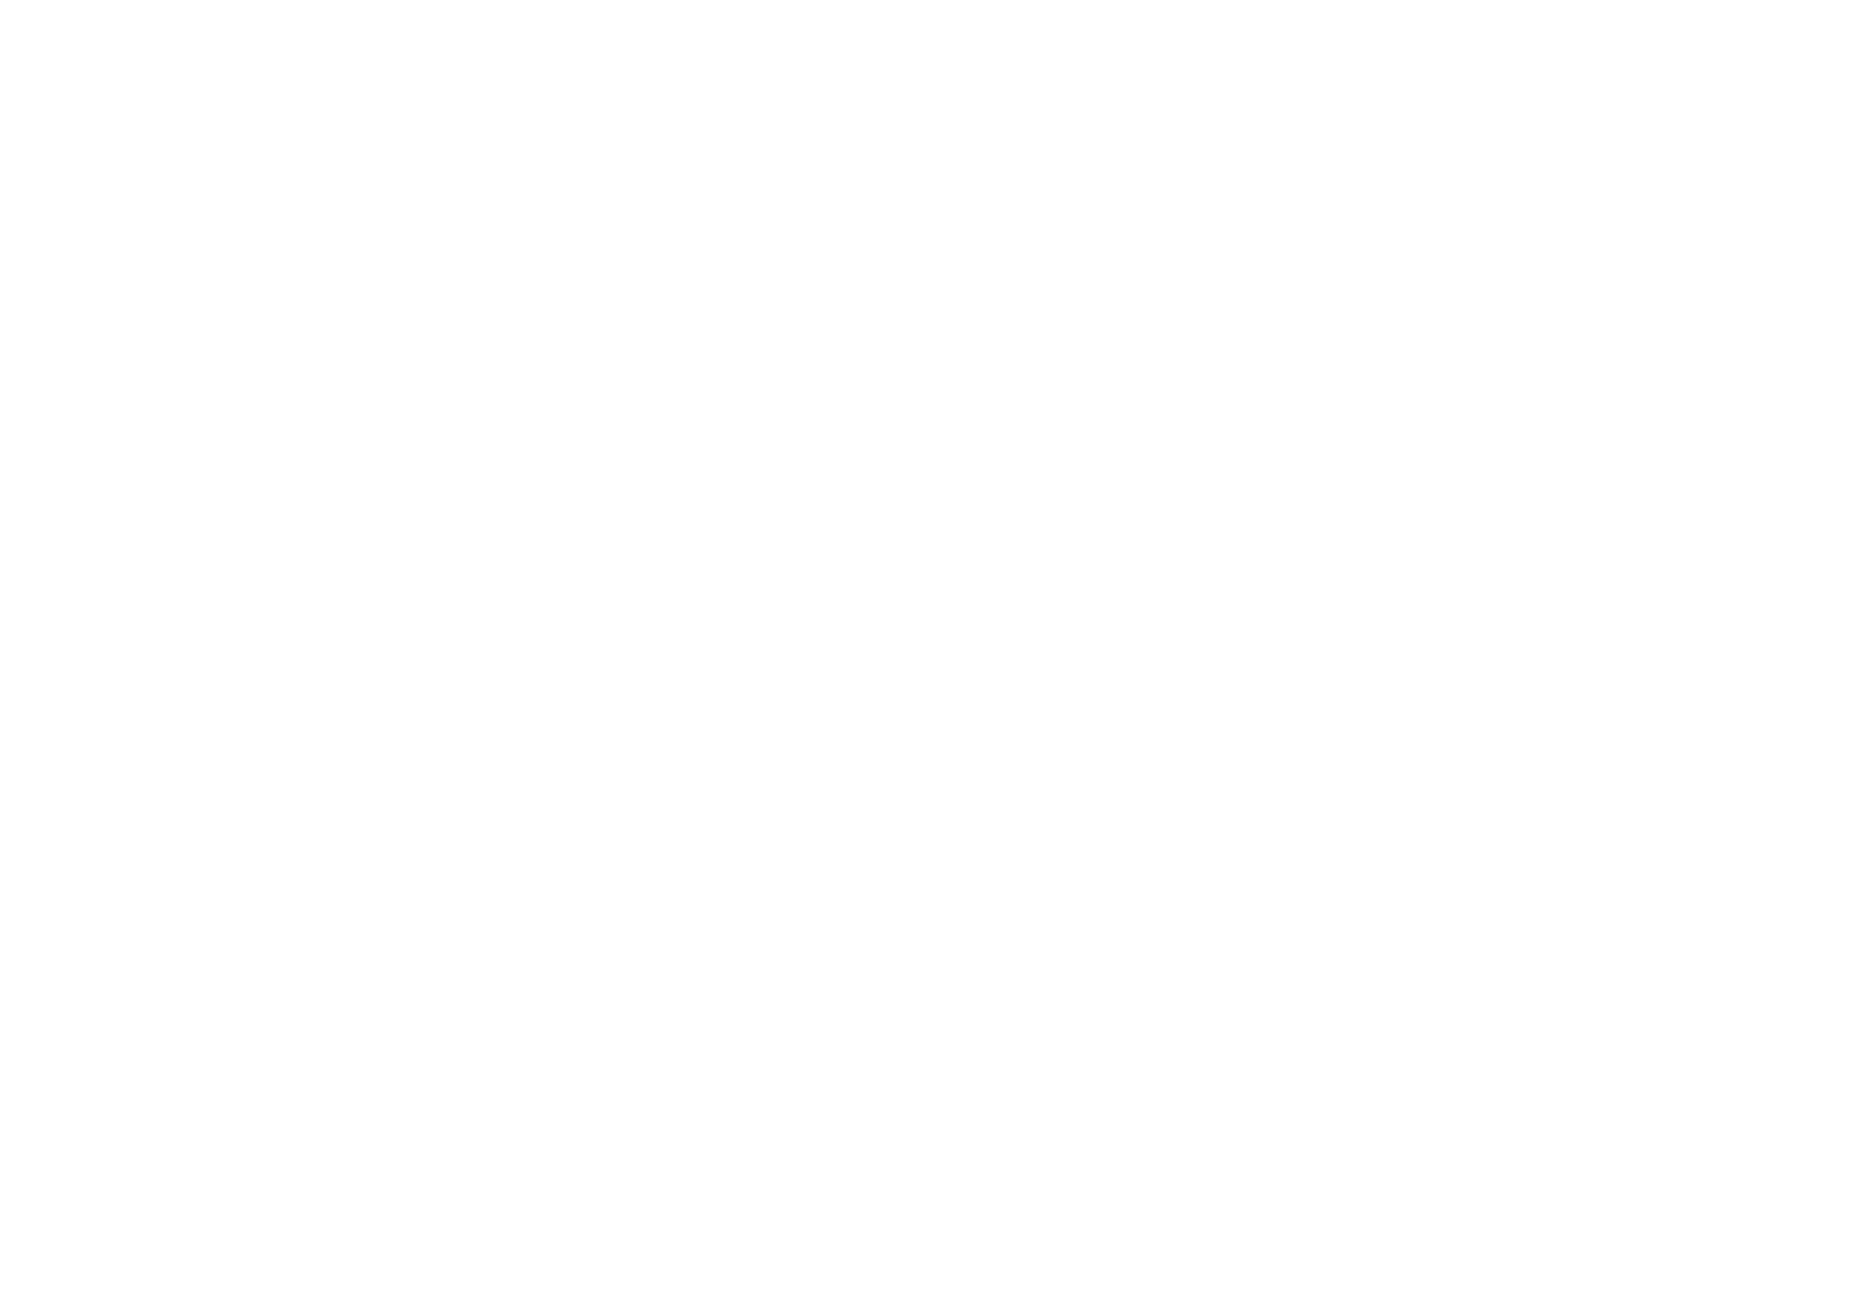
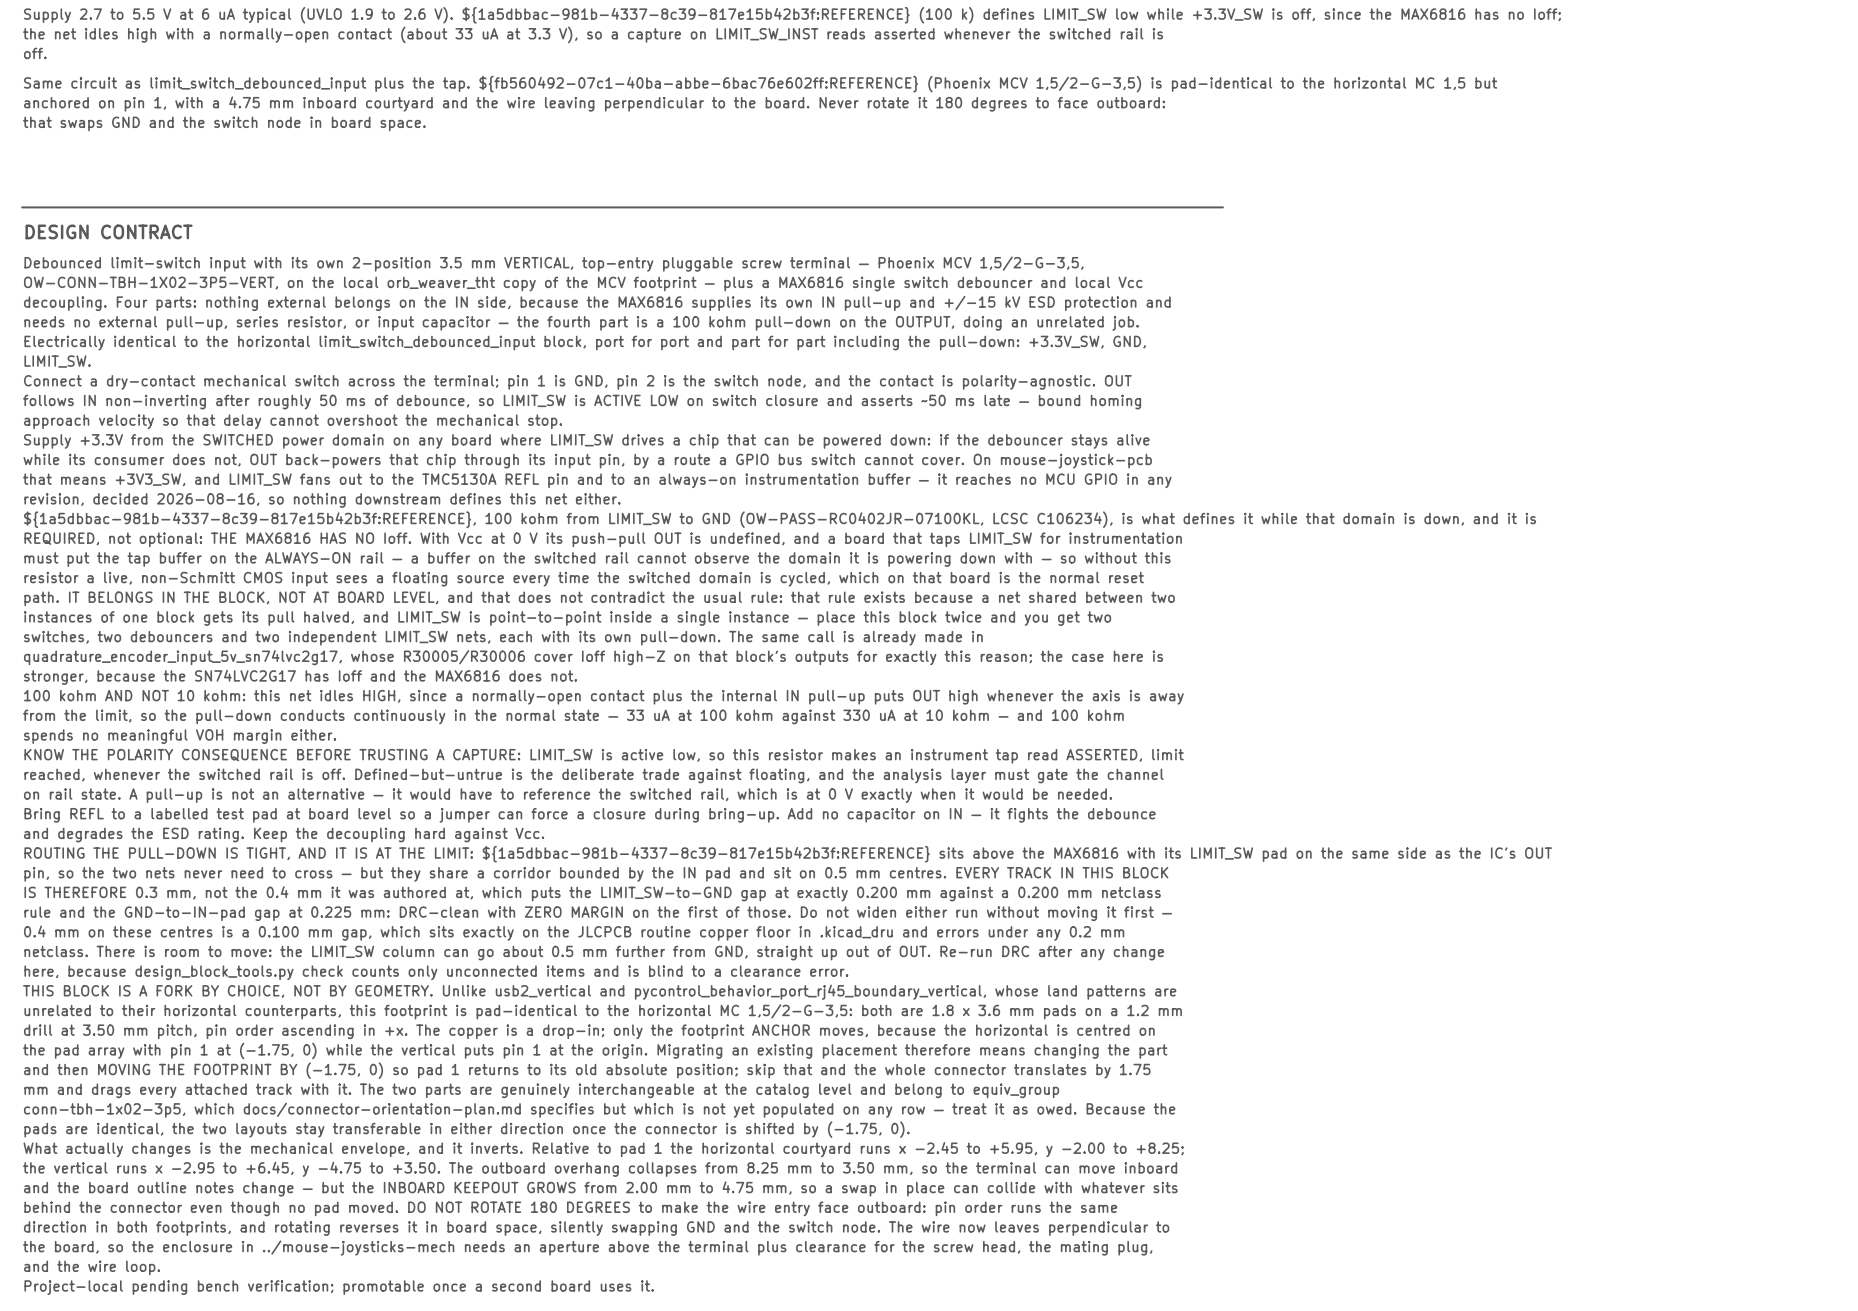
text: none -> Supply 2.7 to 5.5 V at 6 uA typical (UVLO 1.9 to 2.6 V). ${1a5dbbac-981b-4337-8c39-817e15b42b3f:REFERENCE} (100 k) defines LIMIT_SW low while +3.3V_SW is off, since the MAX6816 has no Ioff; (792, 15)
text: none -> the net idles high with a normally-open contact (about 33 uA at 3.3 V), so a capture on LIMIT_SW_INST reads asserted whenever the switched rail is (593, 34)
text: none -> off. (35, 53)
text: none -> Same circuit as limit_switch_debounced_input plus the tap. ${fb560492-07c1-40ba-abbe-6bac76e602ff:REFERENCE} (Phoenix MCV 1,5/2-G-3,5) is pad-identical to the horizontal MC 1,5 but (760, 84)
text: none -> anchored on pin 1, with a 4.75 mm inboard courtyard and the wire leaving perpendicular to the board. Never rotate it 180 degrees to face outboard: (594, 104)
text: none -> that swaps GND and the switch node in board space. (224, 123)
line: none -> (22, 207) (1222, 207)
text: none -> DESIGN CONTRACT (109, 231)
text: none -> Debounced limit-switch input with its own 2-position 3.5 mm VERTICAL, top-entry pluggable screw terminal — Phoenix MCV 1,5/2-G-3,5, (553, 264)
text: none -> OW-CONN-TBH-1X02-3P5-VERT, on the local orb_weaver_tht copy of the MCV footprint — plus a MAX6816 single switch debouncer and local Vcc (583, 284)
text: none -> decoupling. Four parts: nothing external belongs on the IN side, because the MAX6816 supplies its own IN pull-up and +/-15 kV ESD protection and (597, 303)
text: none -> needs no external pull-up, series resistor, or input capacitor — the fourth part is a 100 kohm pull-down on the OUTPUT, doing an unrelated job. (581, 323)
text: none -> Electrically identical to the horizontal limit_switch_debounced_input block, port for port and part for part including the pull-down: +3.3V_SW, GND, (585, 343)
text: none -> LIMIT_SW. (57, 361)
text: none -> Connect a dry-contact mechanical switch across the terminal; pin 1 is GND, pin 2 is the switch node, and the contact is polarity-agnostic. OUT (577, 382)
text: none -> follows IN non-inverting after roughly 50 ms of debounce, so LIMIT_SW is ACTIVE LOW on switch closure and asserts ~50 ms late — bound homing (582, 402)
text: none -> approach velocity so that delay cannot overshoot the mechanical stop. (293, 421)
text: none -> Supply +3.3V from the SWITCHED power domain on any board where LIMIT_SW drives a chip that can be powered down: if the debouncer stays alive (586, 441)
text: none -> while its consumer does not, OUT back-powers that chip through its input pin, by a route a GPIO bus switch cannot cover. On mouse-joystick-pcb (587, 461)
text: none -> that means +3V3_SW, and LIMIT_SW fans out to the TMC5130A REFL pin and to an always-on instrumentation buffer — it reaches no MCU GPIO in any (597, 480)
text: none -> revision, decided 2026-08-16, so nothing downstream defines this net either. (322, 500)
text: none -> ${1a5dbbac-981b-4337-8c39-817e15b42b3f:REFERENCE}, 100 kohm from LIMIT_SW to GND (OW-PASS-RC0402JR-07100KL, LCSC C106234), is what defines it while that domain is down, and it is (780, 519)
text: none -> REQUIRED, not optional: THE MAX6816 HAS NO Ioff. With Vcc at 0 V its push-pull OUT is undefined, and a board that taps LIMIT_SW for instrumentation (603, 539)
text: none -> must put the tap buffer on the ALWAYS-ON rail — a buffer on the switched rail cannot observe the domain it is powering down with — so without this (597, 559)
text: none -> resistor a live, non-Schmitt CMOS input sees a floating source every time the switched domain is cycled, which on that board is the normal reset (584, 579)
text: none -> path. IT BELONGS IN THE BLOCK, NOT AT BOARD LEVEL, and that does not contradict the usual rule: that rule exists because a net shared between two (599, 598)
text: none -> instances of one block gets its pull halved, and LIMIT_SW is point-to-point inside a single instance — place this block twice and you get two (567, 618)
text: none -> switches, two debouncers and two independent LIMIT_SW nets, each with its own pull-down. The same call is already made in (503, 638)
text: none -> quadrature_encoder_input_5v_sn74lvc2g17, whose R30005/R30006 cover Ioff high-Z on that block's outputs for exactly this reason; the case here is (593, 657)
text: none -> stronger, because the SN74LVC2G17 has Ioff and the MAX6816 does not. (300, 677)
text: none -> 100 kohm AND NOT 10 kohm: this net idles HIGH, since a normally-open contact plus the internal IN pull-up puts OUT high whenever the axis is away (603, 697)
text: none -> from the limit, so the pull-down conducts continuously in the normal state — 33 uA at 100 kohm against 330 uA at 10 kohm — and 100 kohm (573, 716)
text: none -> spends no meaningful VOH margin either. (180, 736)
text: none -> KNOW THE POLARITY CONSEQUENCE BEFORE TRUSTING A CAPTURE: LIMIT_SW is active low, so this resistor makes an instrument tap read ASSERTED, limit (604, 756)
text: none -> reached, whenever the switched rail is off. Defined-but-untrue is the deliberate trade against floating, and the analysis layer must gate the channel (594, 775)
text: none -> on rail state. A pull-up is not an alternative — it would have to reference the switched rail, which is at 0 V exactly when it would be needed. (568, 795)
text: none -> Bring REFL to a labelled test pad at board level so a jumper can force a closure during bring-up. Add no capacitor on IN — it fights the debounce (590, 815)
text: none -> and degrades the ESD rating. Keep the decoupling hard against Vcc. (284, 834)
text: none -> ROUTING THE PULL-DOWN IS TIGHT, AND IT IS AT THE LIMIT: ${1a5dbbac-981b-4337-8c39-817e15b42b3f:REFERENCE} sits above the MAX6816 with its LIMIT_SW pad on the same side as the IC's OUT (788, 854)
text: none -> pin, so the two nets never need to cross — but they share a corridor bounded by the IN pad and sit on 0.5 mm centres. EVERY TRACK IN THIS BLOCK (596, 874)
text: none -> IS THEREFORE 0.3 mm, not the 0.4 mm it was authored at, which puts the LIMIT_SW-to-GND gap at exactly 0.200 mm against a 0.200 mm netclass (592, 893)
text: none -> rule and the GND-to-IN-pad gap at 0.225 mm: DRC-clean with ZERO MARGIN on the first of those. Do not widen either run without moving it first — (598, 913)
text: none -> 0.4 mm on these centres is a 0.100 mm gap, which sits exactly on the JLCPCB routine copper floor in .kicad_dru and errors under any 0.2 mm (574, 933)
text: none -> netclass. There is room to move: the LIMIT_SW column can go about 0.5 mm further from GND, straight up out of OUT. Re-run DRC after any change (594, 953)
text: none -> here, because design_block_tools.py check counts only unconnected items and is blind to a clearance error. (436, 972)
text: none -> THIS BLOCK IS A FORK BY CHOICE, NOT BY GEOMETRY. Unlike usb2_vertical and pycontrol_behavior_port_rj45_boundary_vertical, whose land patterns are (599, 992)
text: none -> unrelated to their horizontal counterparts, this footprint is pad-identical to the horizontal MC 1,5/2-G-3,5: both are 1.8 x 3.6 mm pads on a 1.2 mm (603, 1011)
text: none -> drill at 3.50 mm pitch, pin order ascending in +x. The copper is a drop-in; only the footprint ANCHOR moves, because the horizontal is centred on (589, 1031)
text: none -> the pad array with pin 1 at (-1.75, 0) while the vertical puts pin 1 at the origin. Migrating an existing placement therefore means changing the part (595, 1050)
text: none -> and then MOVING THE FOOTPRINT BY (-1.75, 0) so pad 1 returns to its old absolute position; skip that and the whole connector translates by 1.75 (587, 1070)
text: none -> mm and drags every attached track with it. The two parts are genuinely interchangeable at the catalog level and belong to equiv_group (541, 1090)
text: none -> conn-tbh-1x02-3p5, which docs/connector-orientation-plan.md specifies but which is not yet populated on any row — treat it as owed. Because the (599, 1110)
text: none -> pads are identical, the two layouts stay transferable in either direction once the connector is shifted by (-1.75, 0). (467, 1129)
text: none -> What actually changes is the mechanical envelope, and it inverts. Relative to pad 1 the horizontal courtyard runs x -2.45 to +5.95, y -2.00 to +8.25; (603, 1149)
text: none -> the vertical runs x -2.95 to +6.45, y -4.75 to +3.50. The outboard overhang collapses from 8.25 mm to 3.50 mm, so the terminal can move inboard (600, 1169)
text: none -> and the board outline notes change — but the INBOARD KEEPOUT GROWS from 2.00 mm to 4.75 mm, so a swap in place can collide with whatever sits (600, 1188)
text: none -> behind the connector even though no pad moved. DO NOT ROTATE 180 DEGREES to make the wire entry face outboard: pin order runs the same (570, 1208)
text: none -> direction in both footprints, and rotating reverses it in board space, silently swapping GND and the switch node. The wire now leaves perpendicular to (596, 1228)
text: none -> the board, so the enclosure in ../mouse-joysticks-mech needs an aperture above the terminal plus clearance for the screw head, the mating plug, (587, 1248)
text: none -> and the wire loop. (92, 1267)
text: none -> Project-local pending bench verification; promotable once a second board uses it. (339, 1287)

